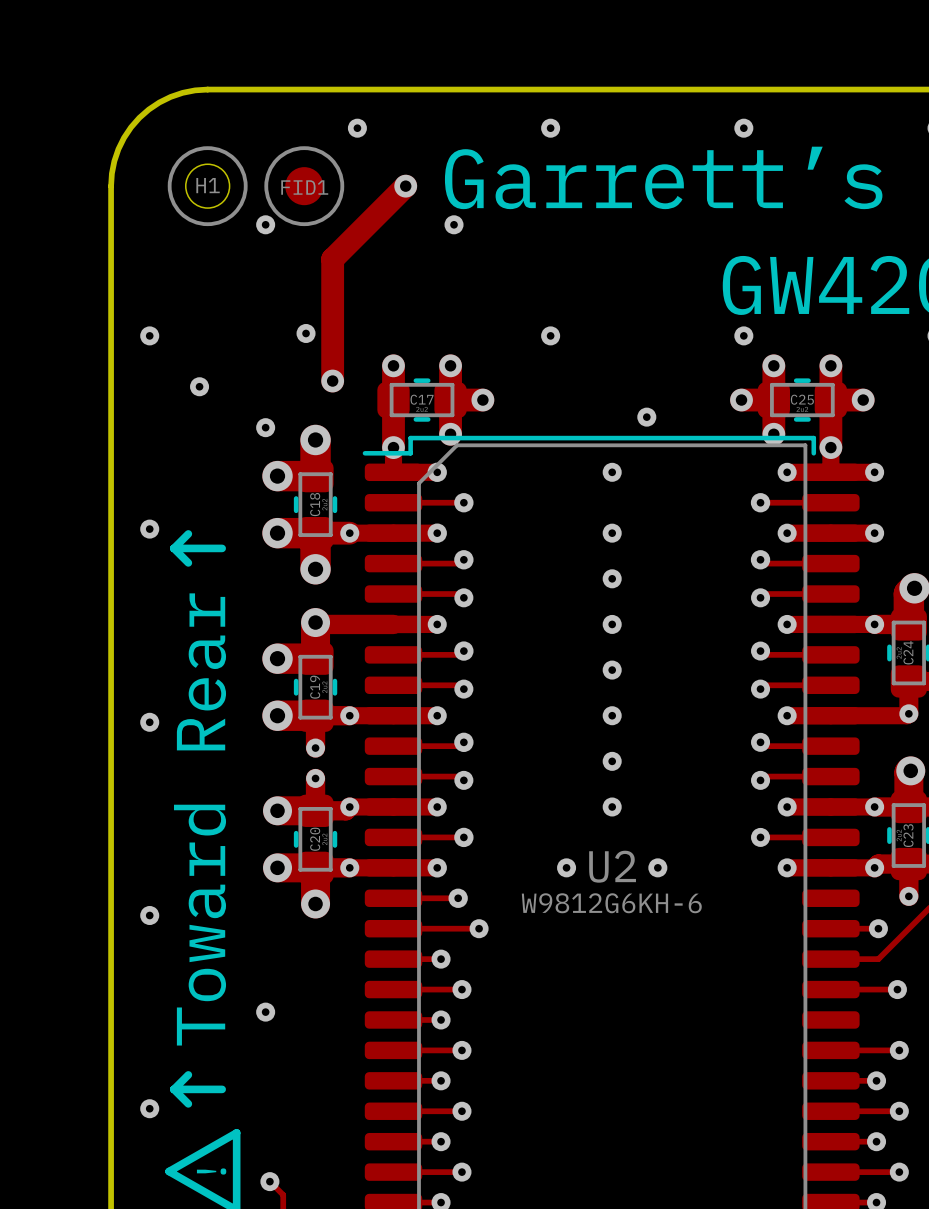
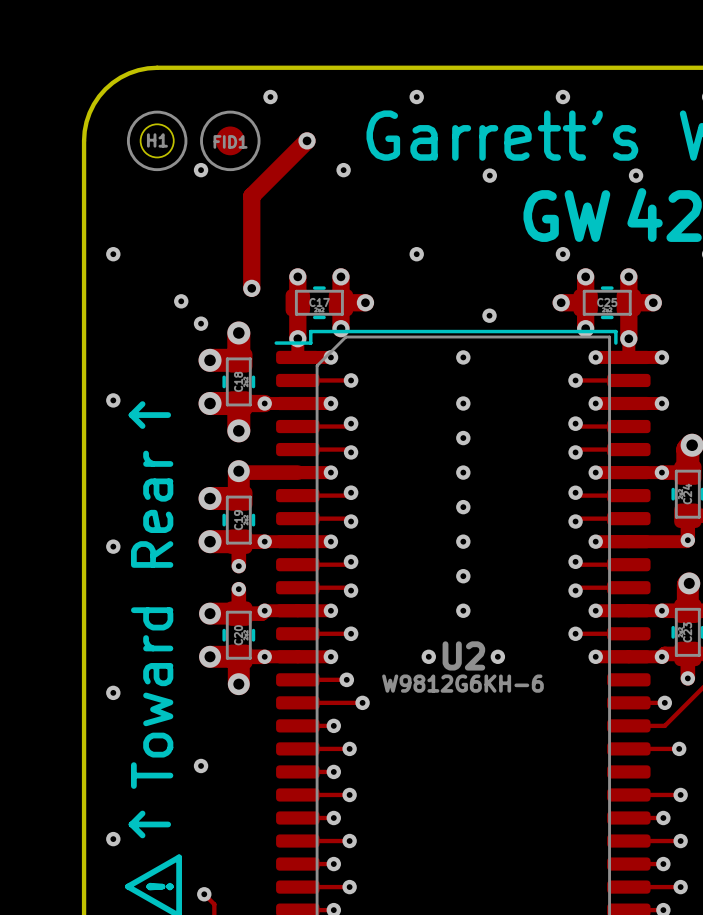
via: none -> (489, 175)
via: none -> (636, 175)
via: (306, 333) -> none
via position: (199, 386) -> (181, 301)

